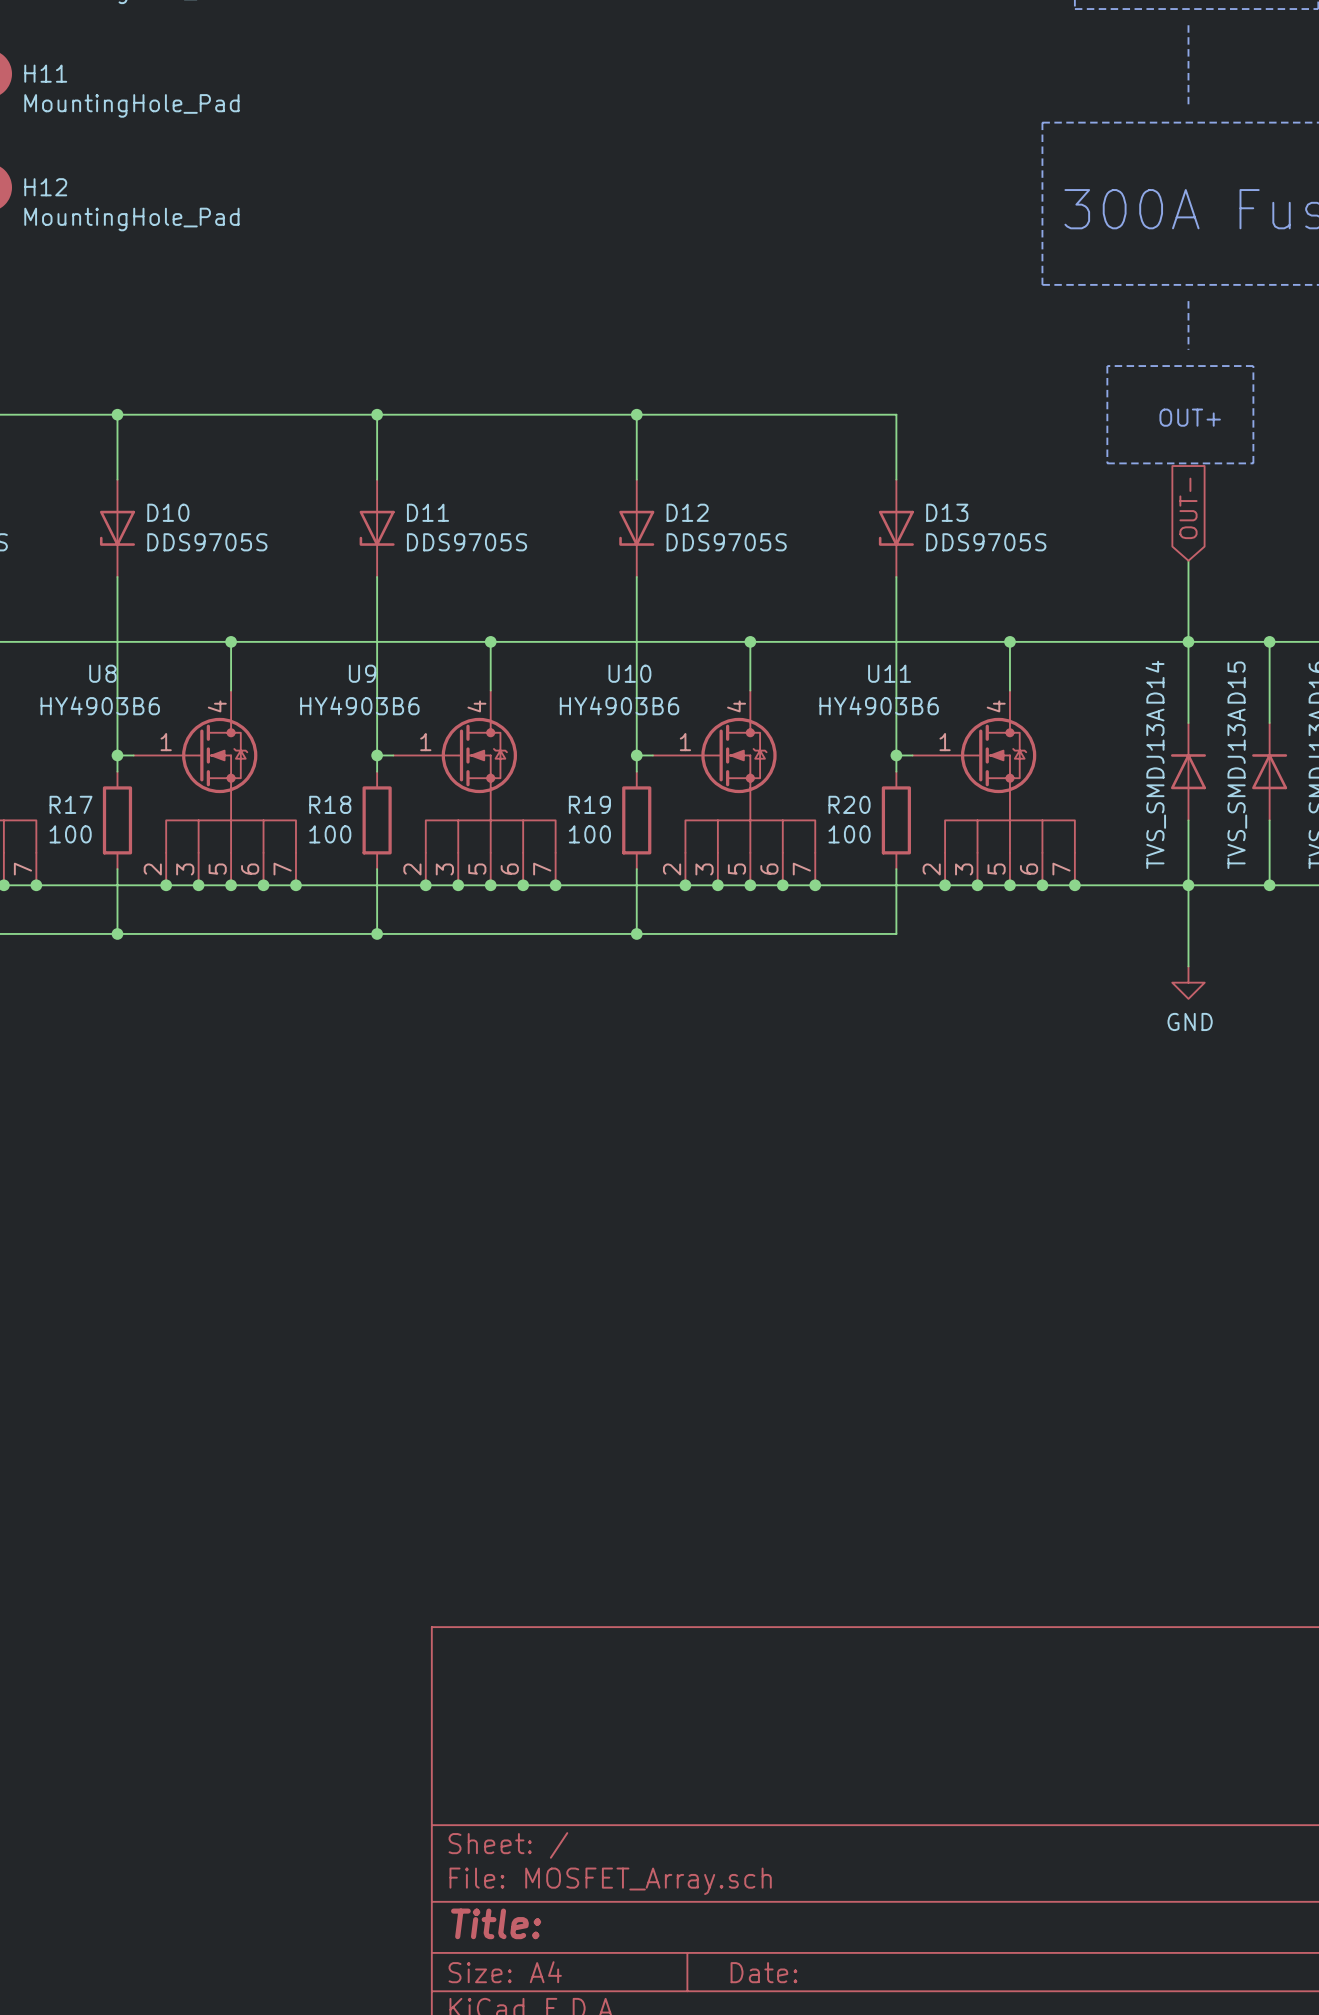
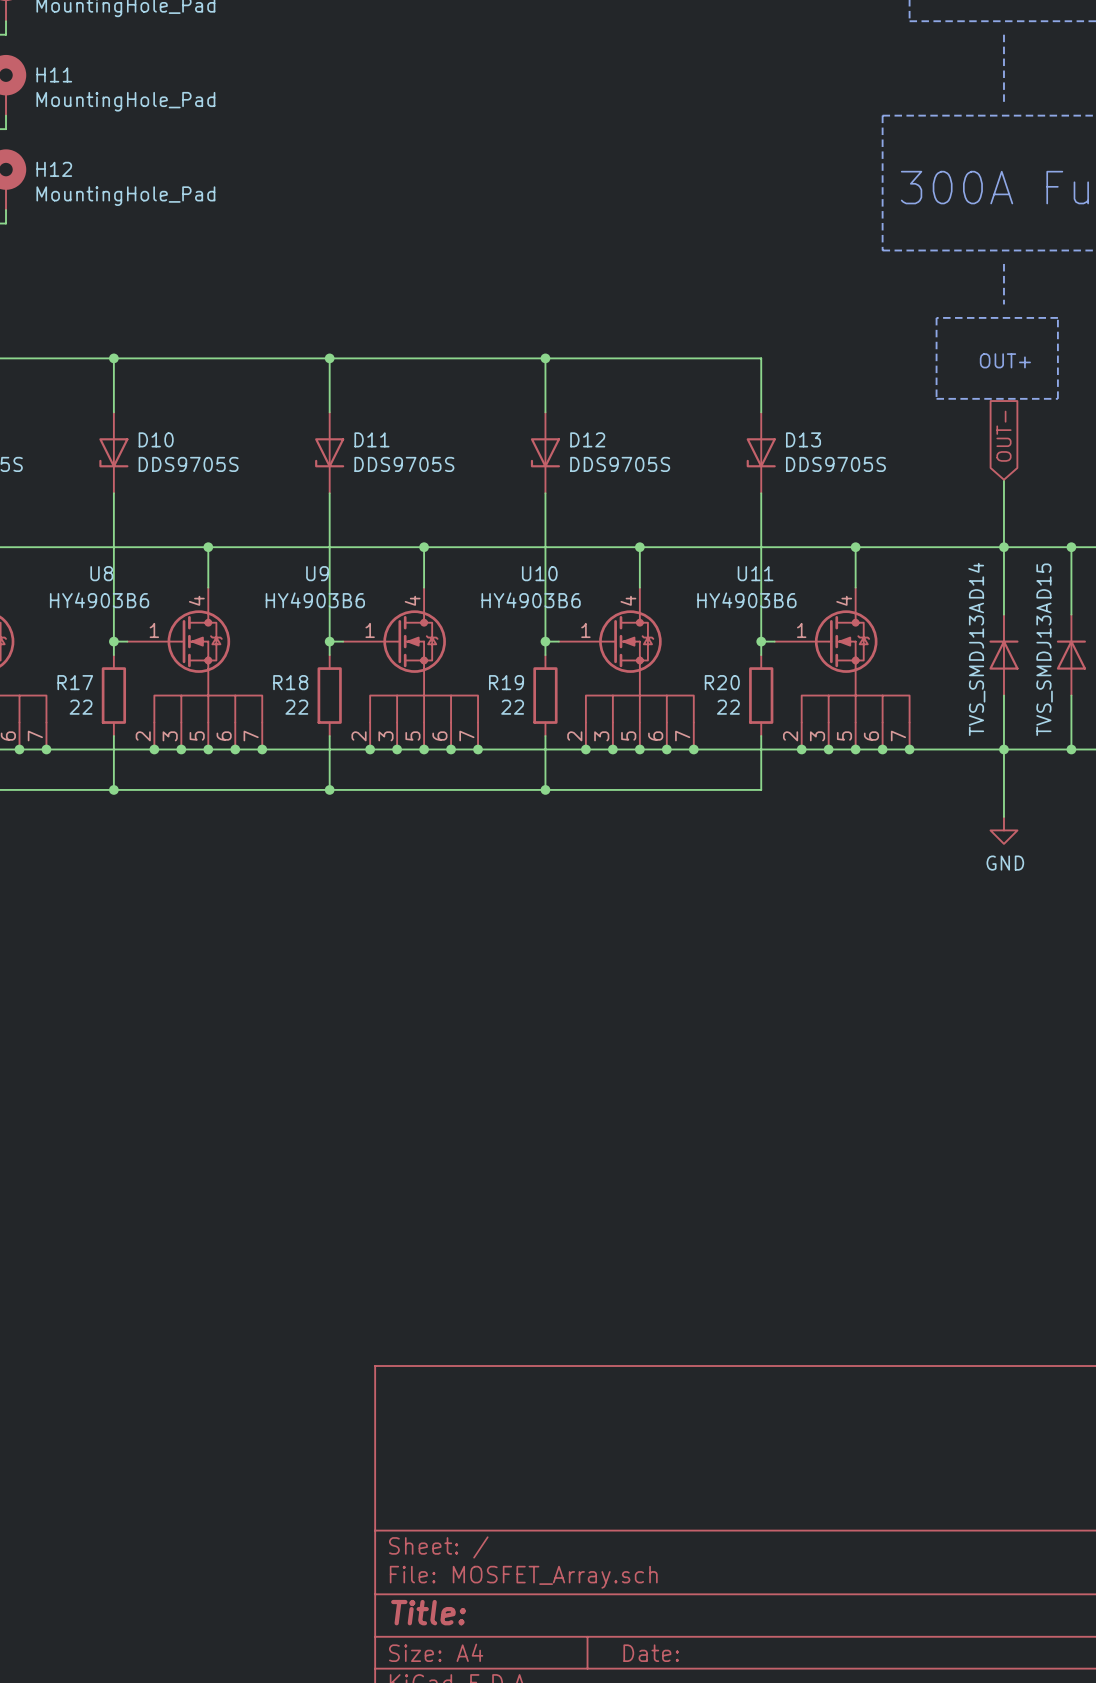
R17 value: 100 (70, 834) -> 22 (81, 707)
R18 value: 100 (330, 834) -> 22 (296, 707)
R19 value: 100 (589, 834) -> 22 (512, 707)
R20 value: 100 (849, 834) -> 22 (728, 707)

